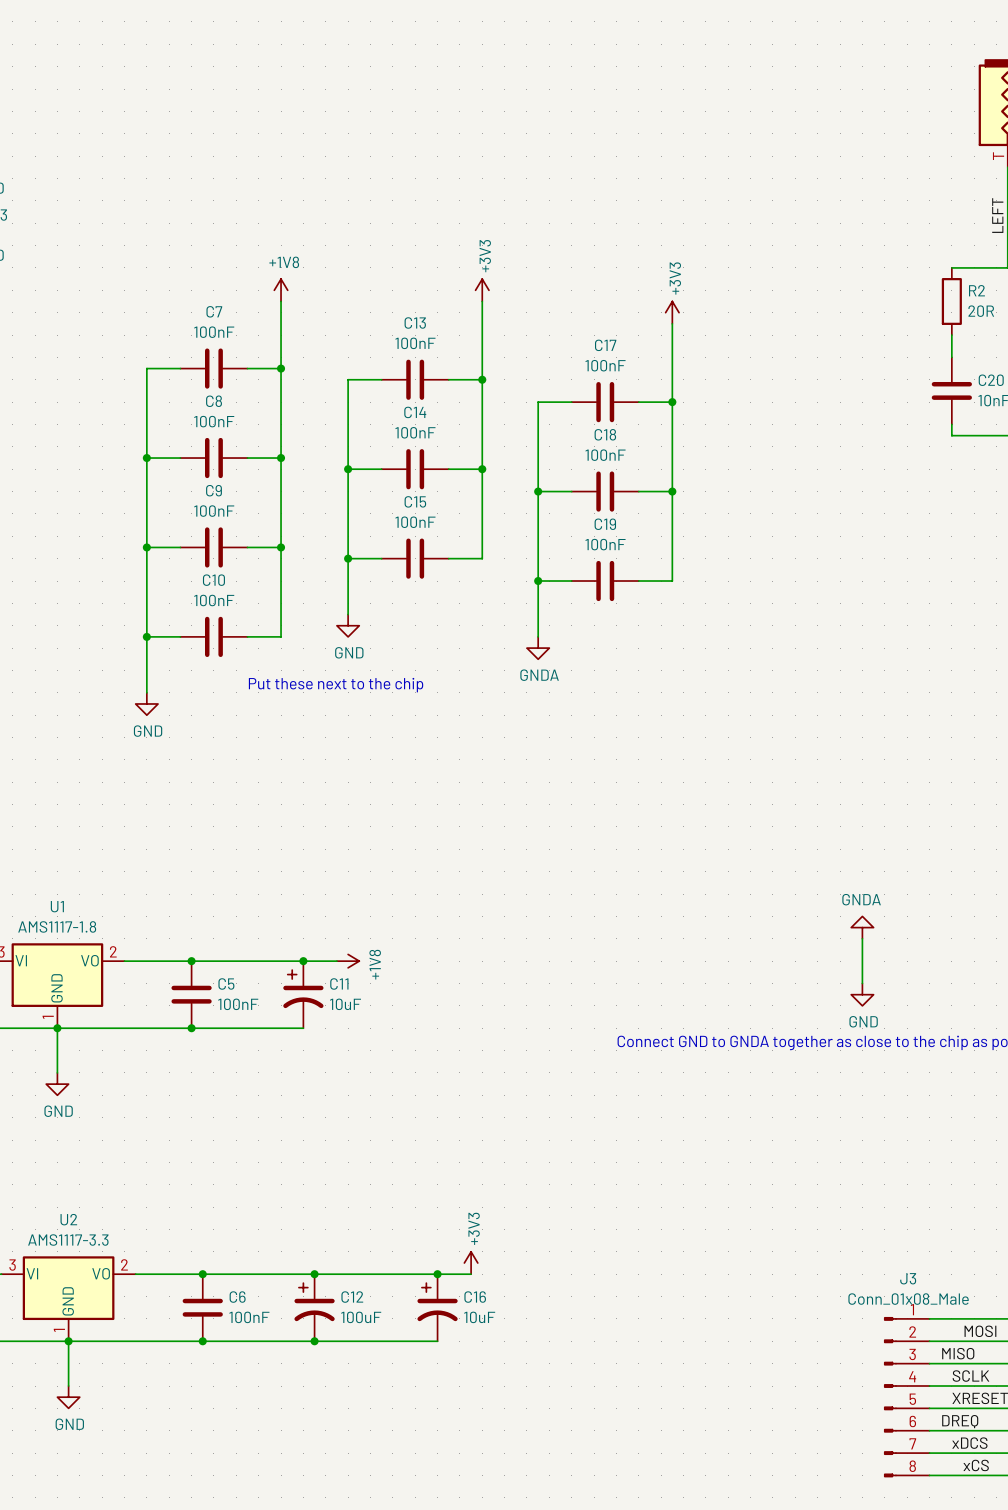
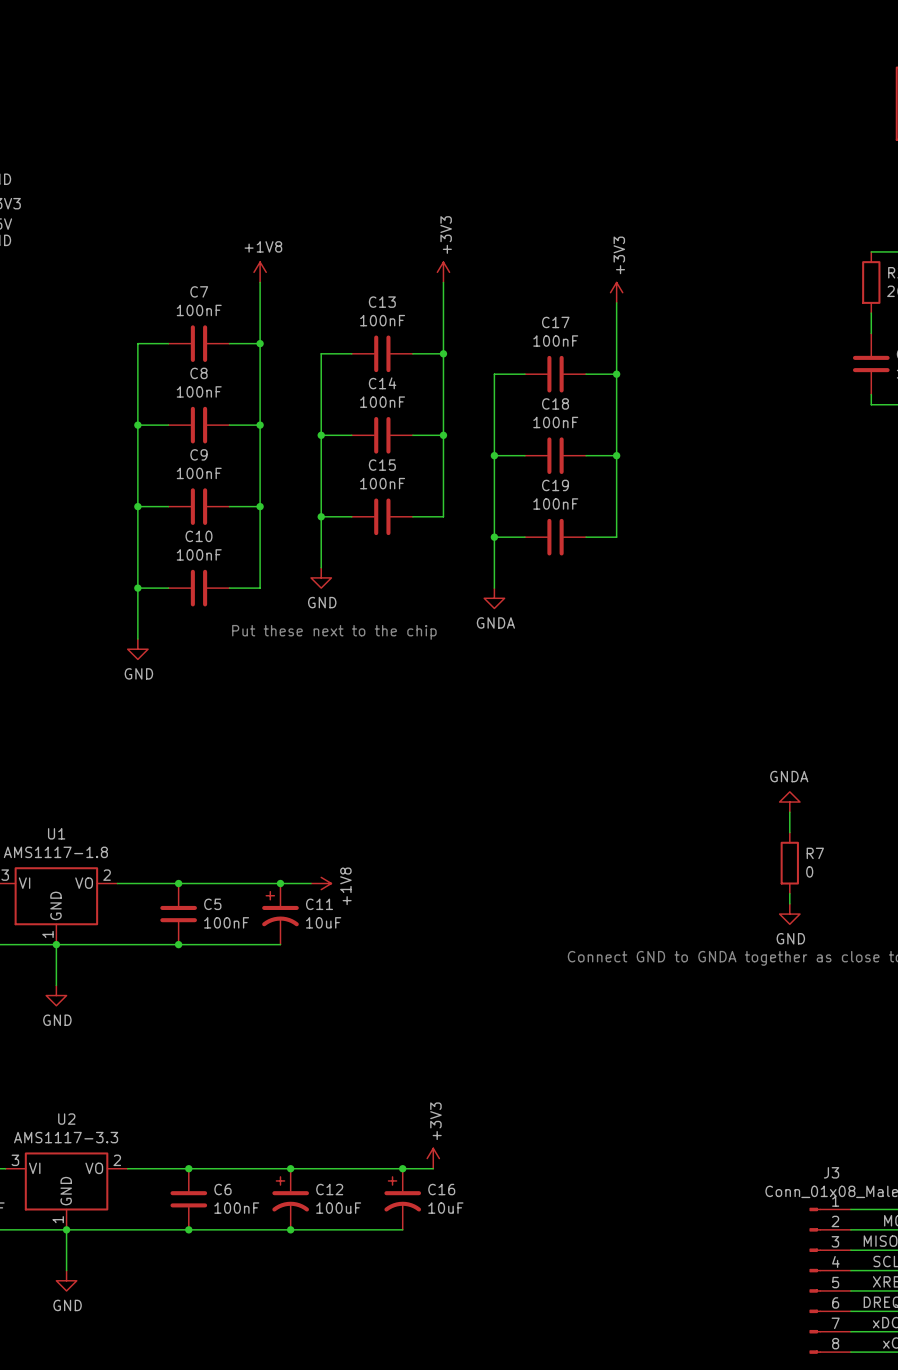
wire: none -> (789, 812) (789, 832)
power symbol position: GNDA (862, 927) -> GNDA (789, 802)
wire: (862, 938) (862, 972) -> none
R7: none -> 0 (789, 863)

